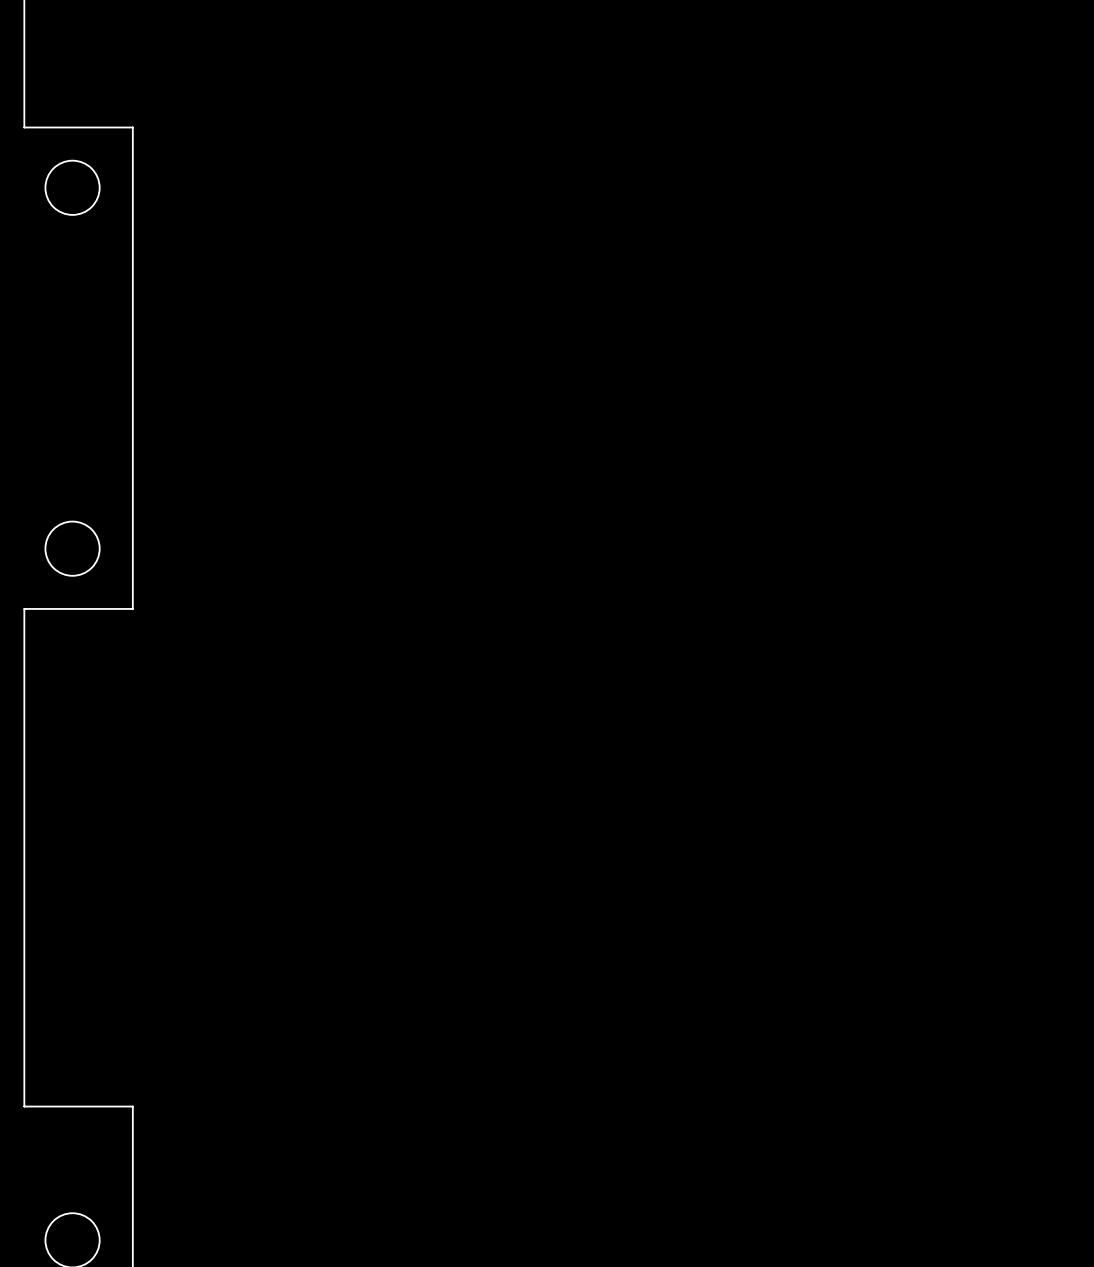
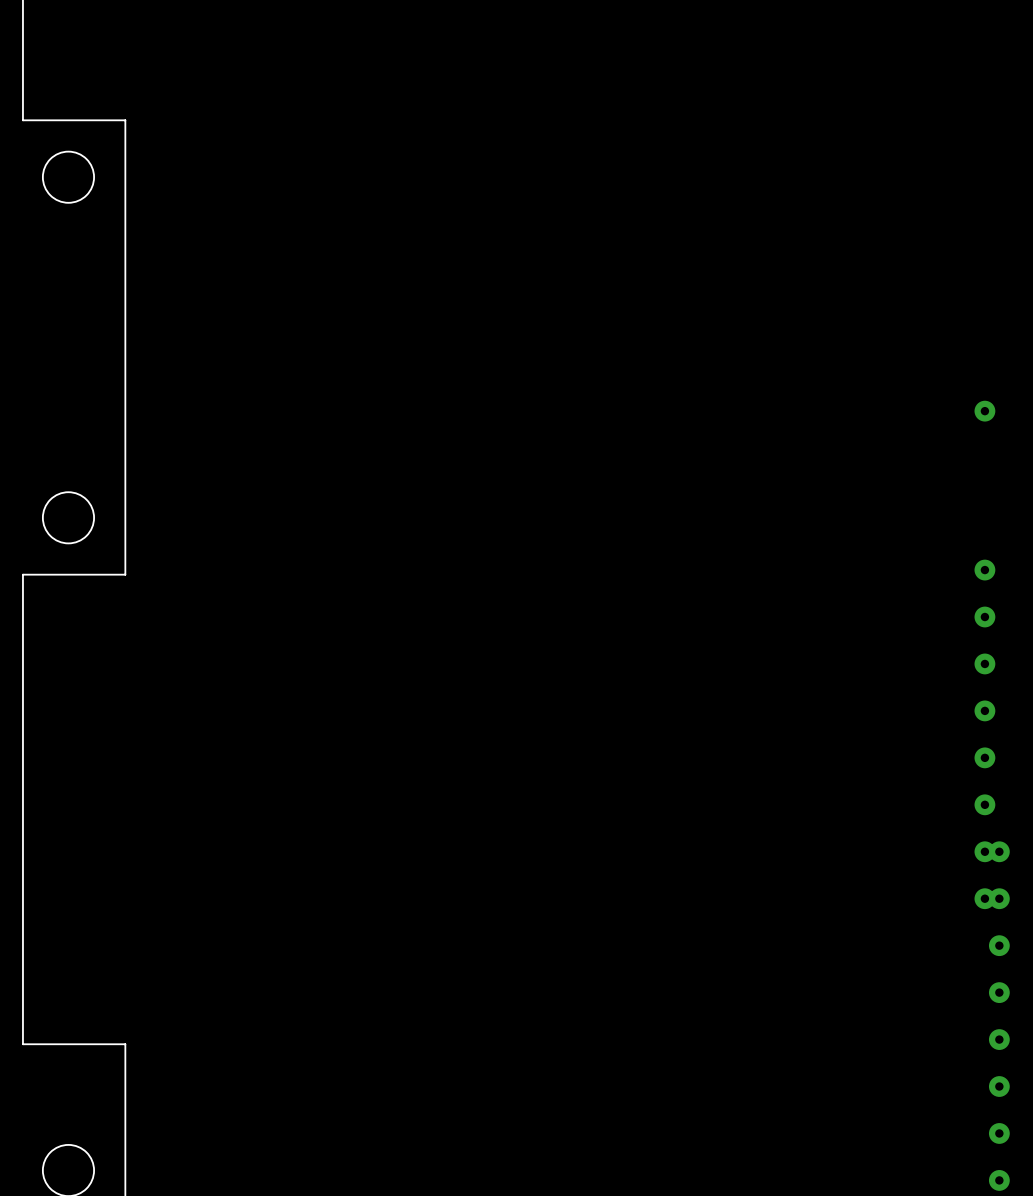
part: none -> (984, 411)
part: none -> (984, 570)
part: none -> (984, 617)
part: none -> (984, 663)
part: none -> (984, 710)
part: none -> (984, 757)
part: none -> (984, 804)
part: none -> (984, 851)
part: none -> (999, 851)
part: none -> (984, 898)
part: none -> (999, 898)
part: none -> (999, 945)
part: none -> (999, 992)
part: none -> (999, 1039)
part: none -> (999, 1086)
part: none -> (999, 1133)
part: none -> (999, 1180)

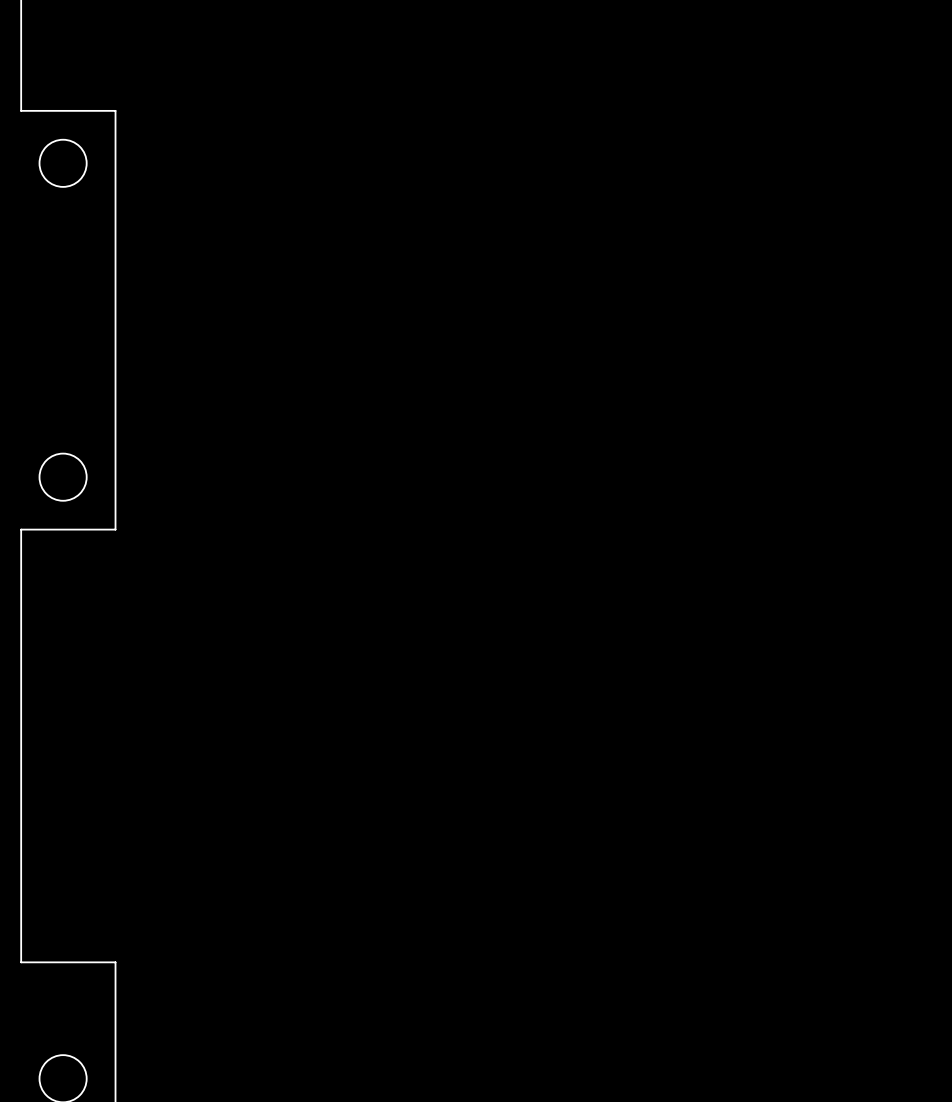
part: (984, 411) -> none
part: (984, 570) -> none
part: (984, 617) -> none
part: (984, 663) -> none
part: (984, 710) -> none
part: (984, 757) -> none
part: (984, 804) -> none
part: (984, 851) -> none
part: (999, 851) -> none
part: (984, 898) -> none
part: (999, 898) -> none
part: (999, 945) -> none
part: (999, 992) -> none
part: (999, 1039) -> none
part: (999, 1086) -> none
part: (999, 1133) -> none
part: (999, 1180) -> none

